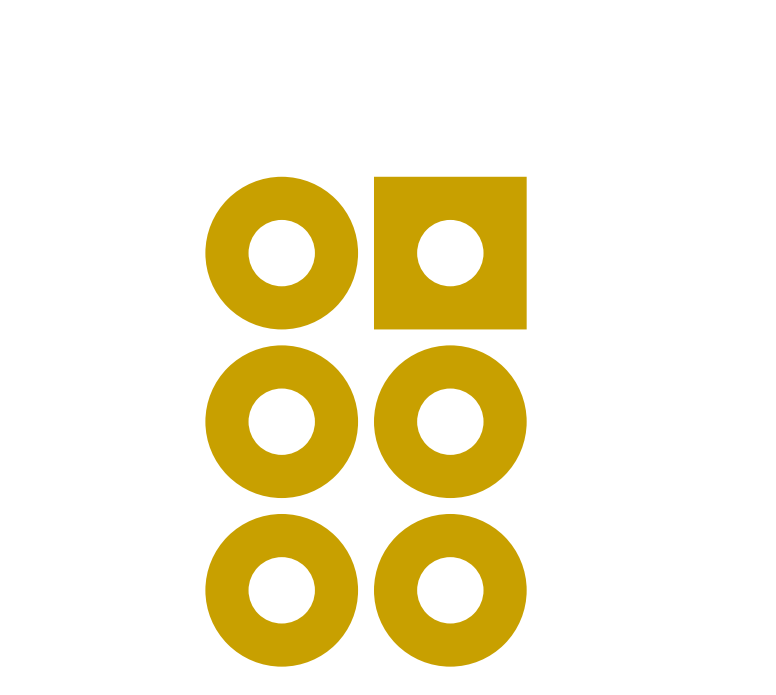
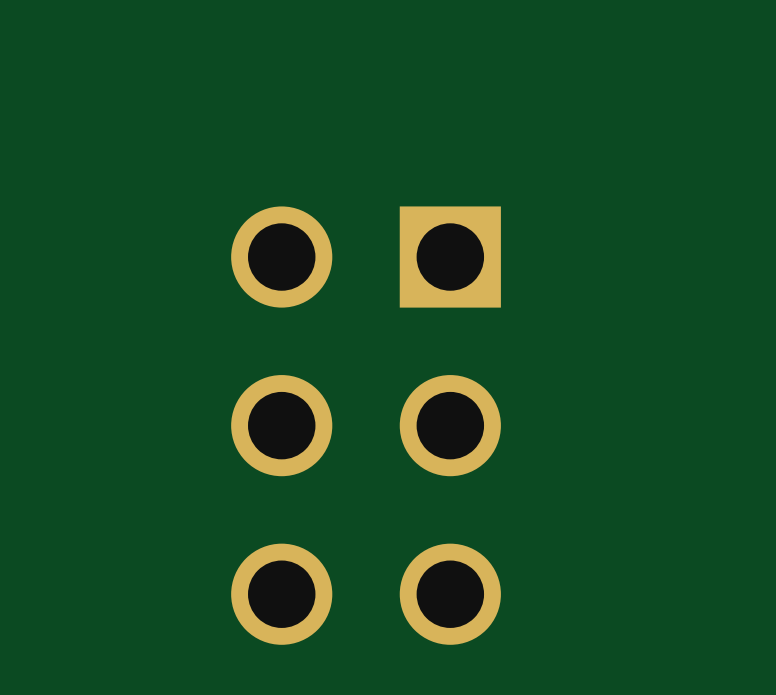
part footprint: [205, 176, 527, 667] -> [231, 206, 501, 645]

